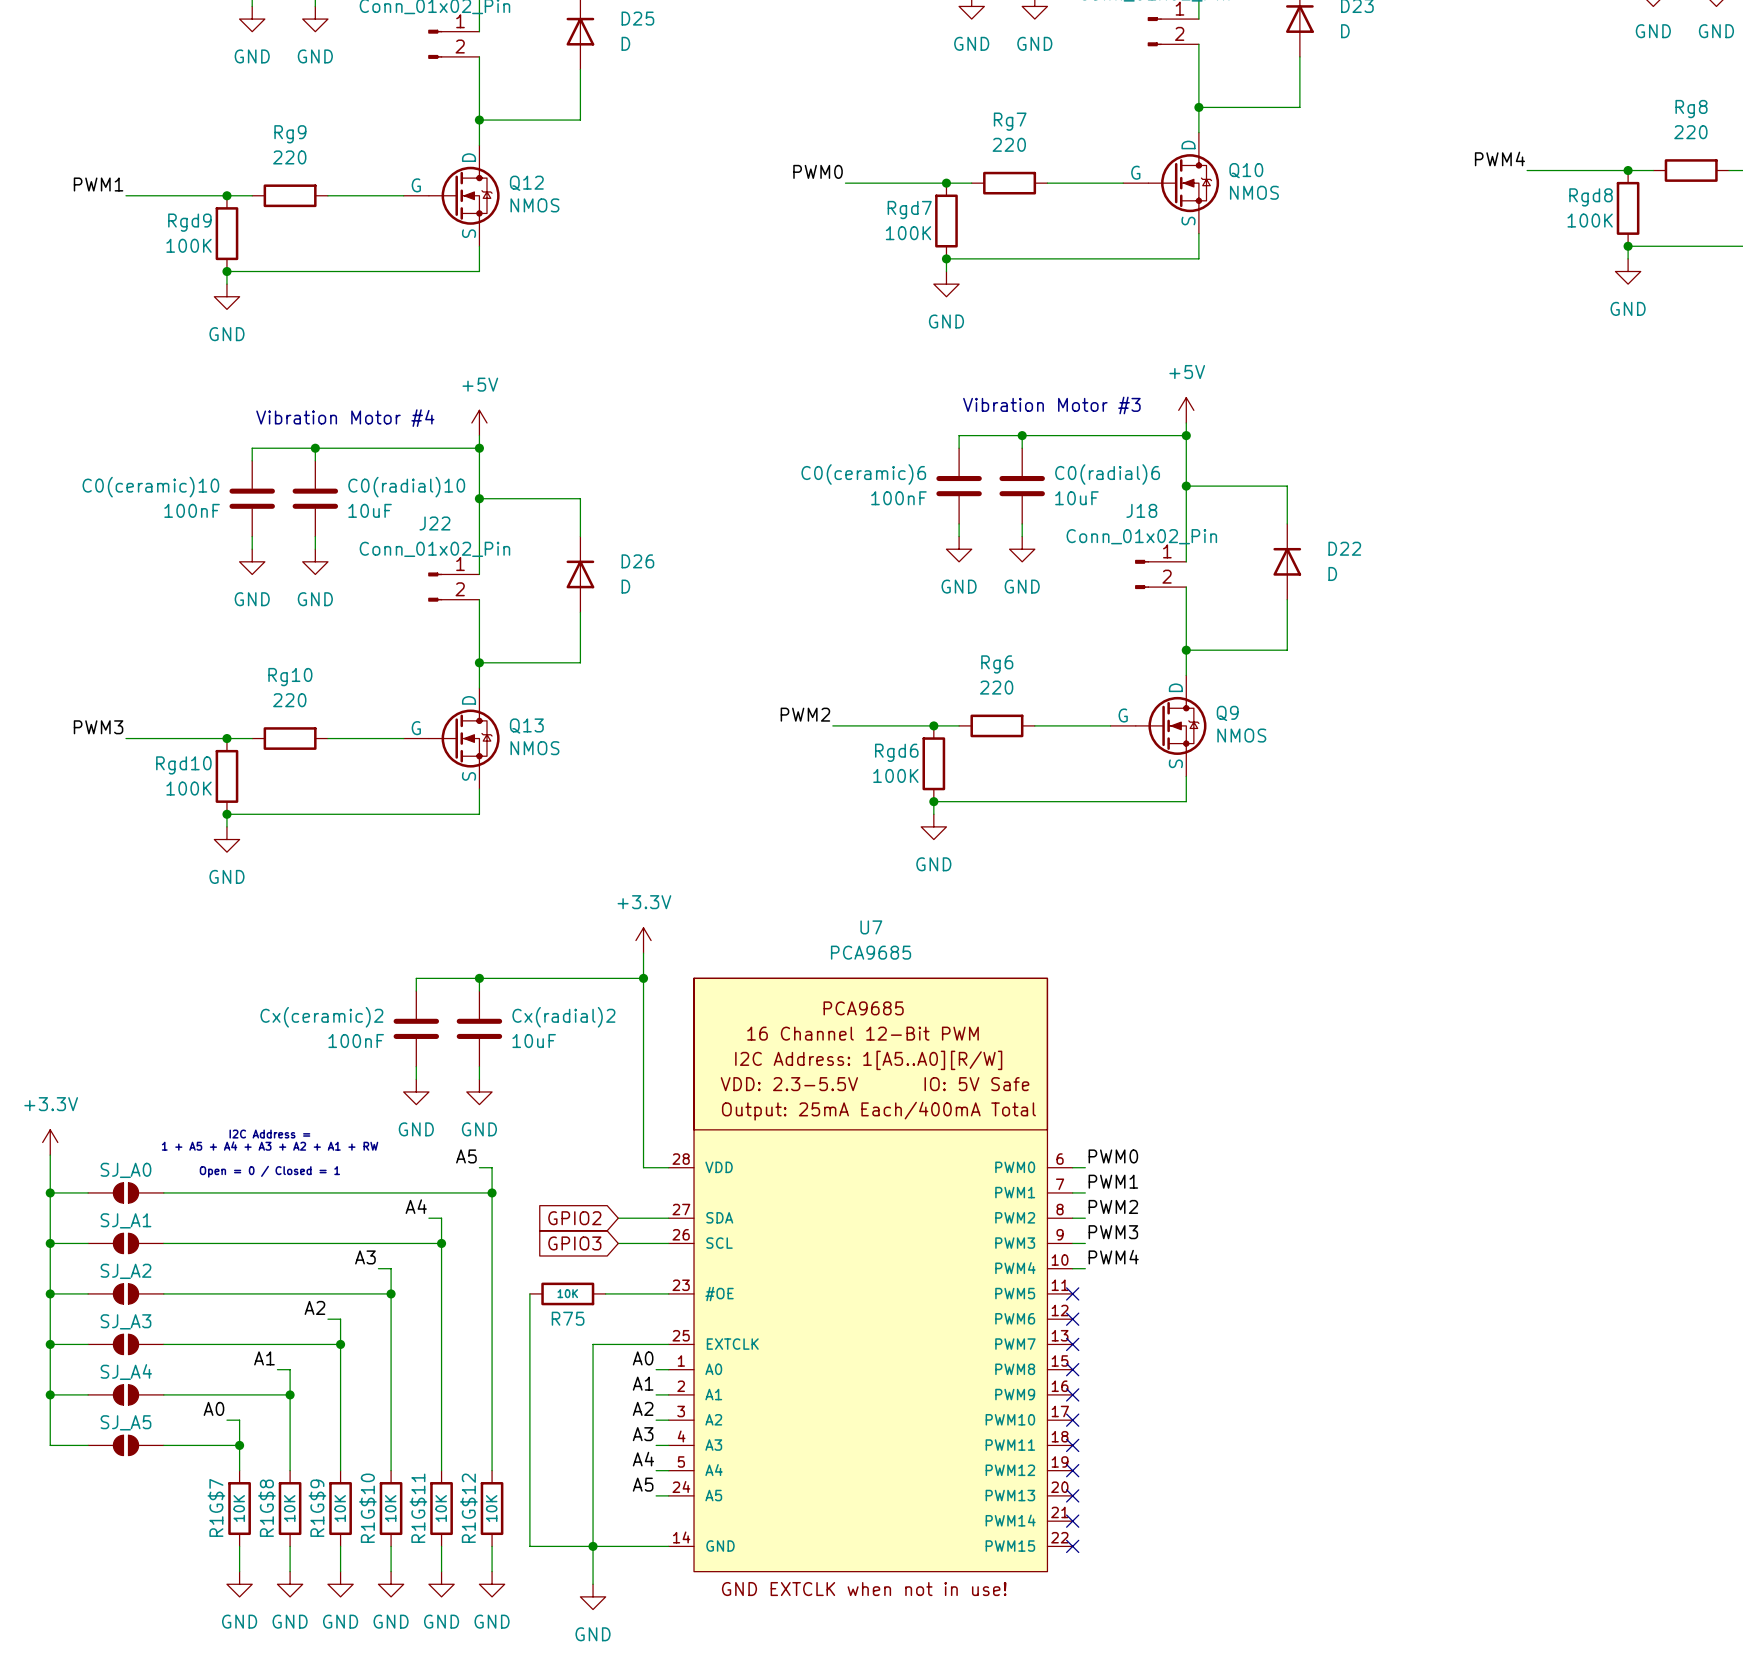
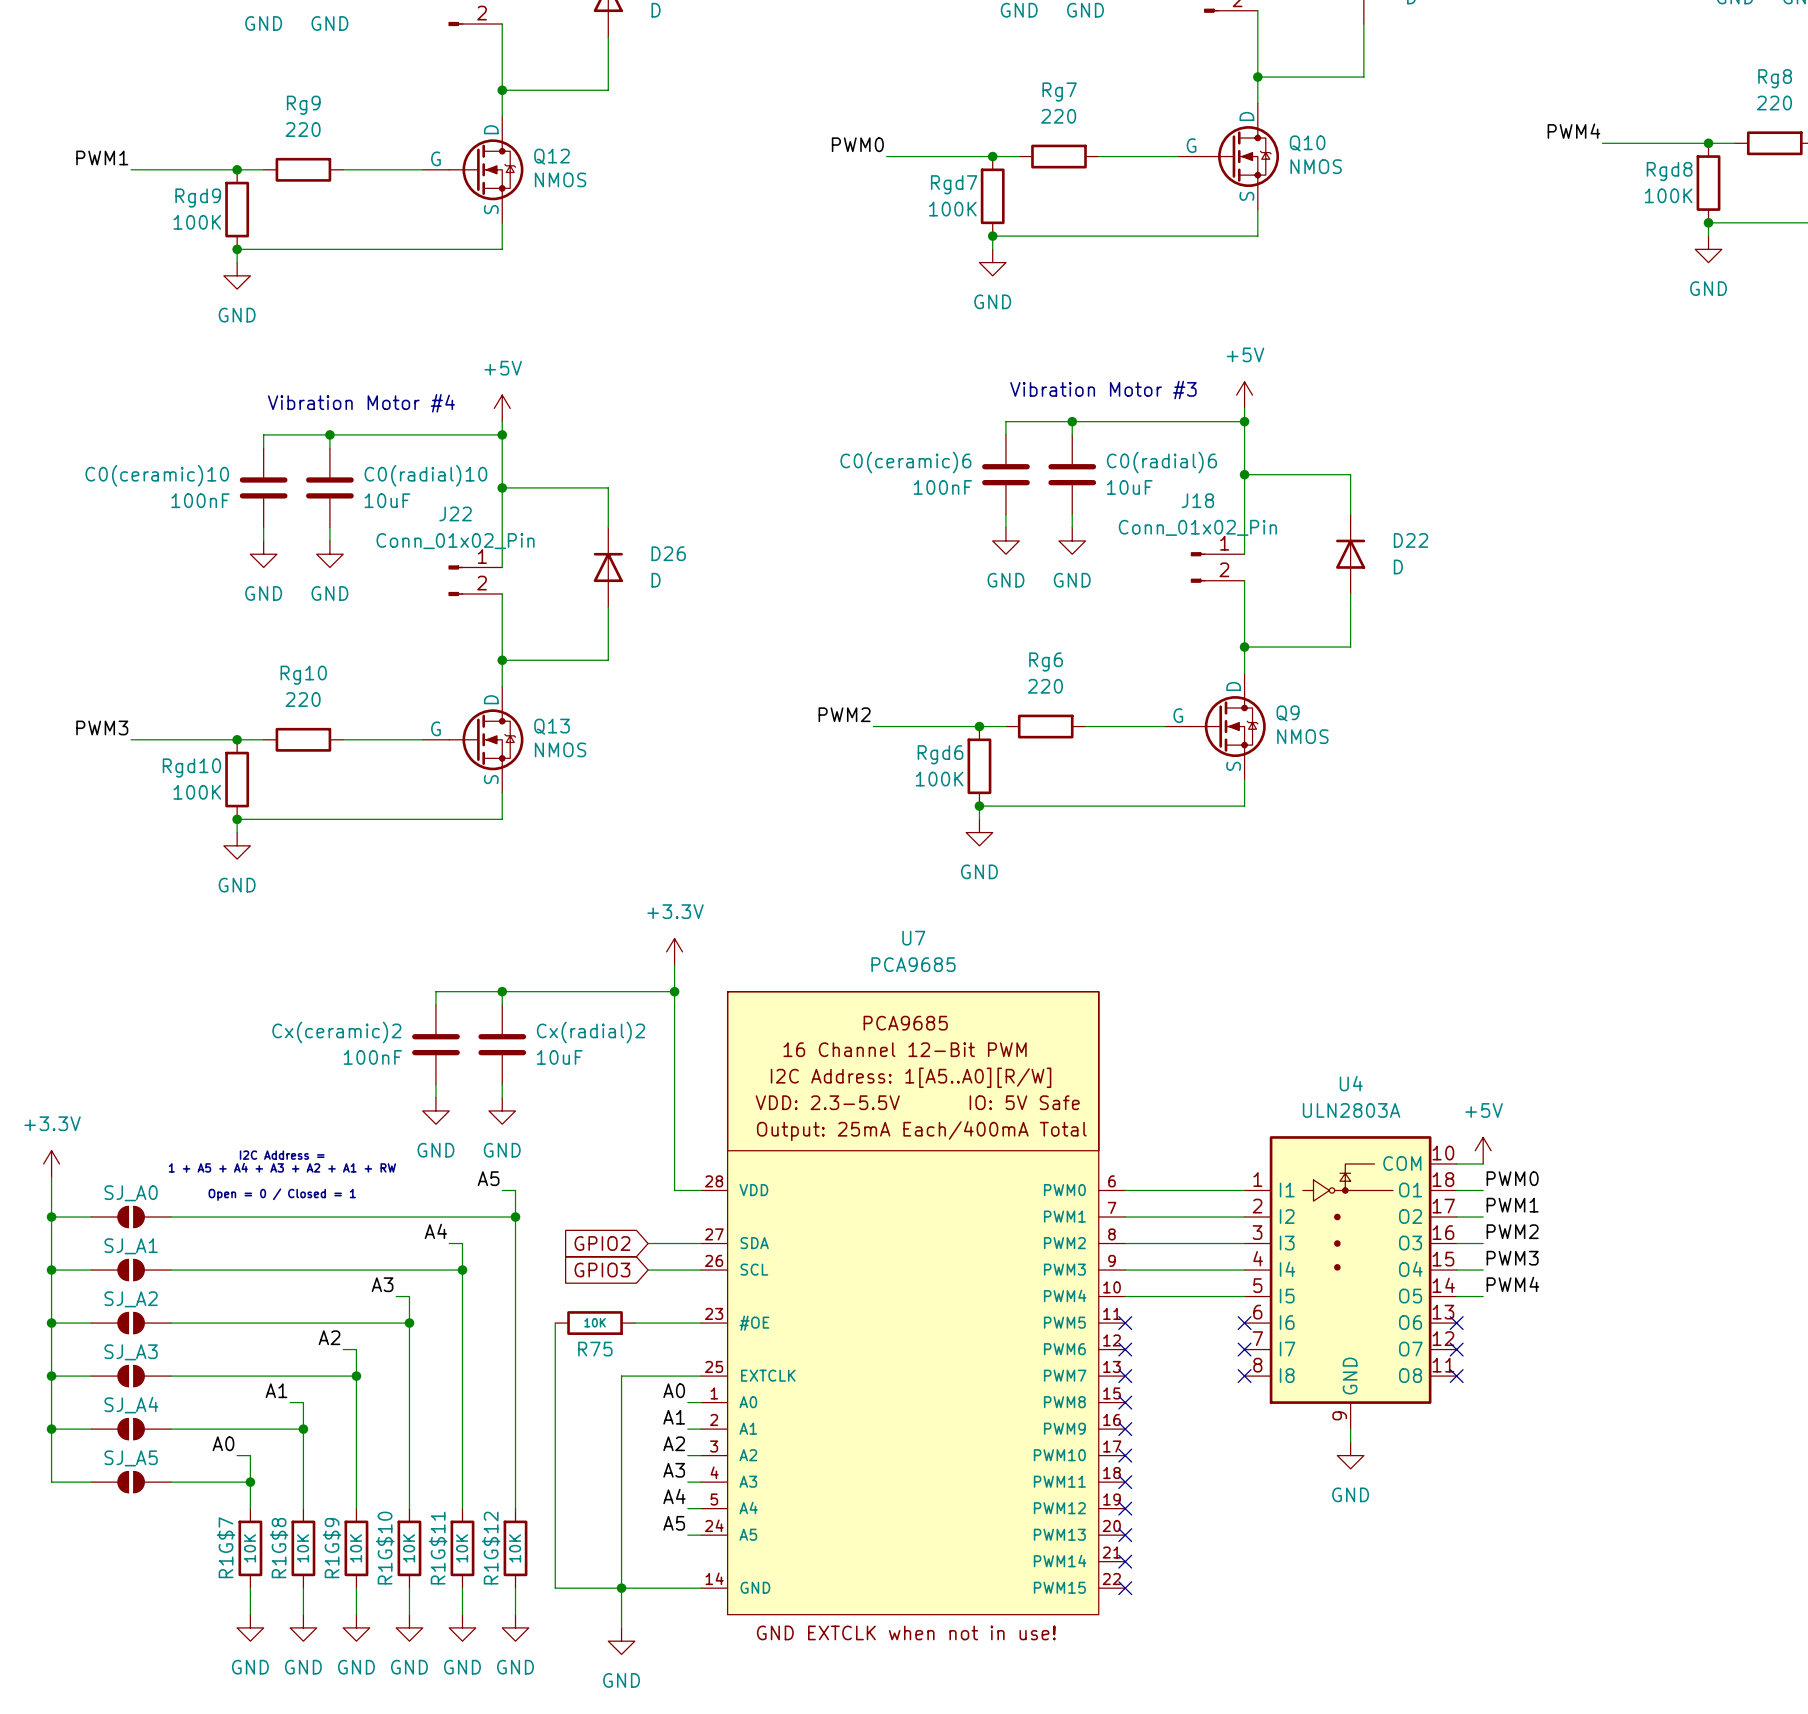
power symbol: none -> +5V (1483, 1150)
wire: none -> (1456, 1163) (1483, 1163)
label: PWM0 (1113, 1156) -> none
label: none -> PWM0 (1512, 1178)
wire: none -> (1138, 1190) (1244, 1190)
wire: none -> (1456, 1190) (1483, 1190)
label: PWM1 (1113, 1181) -> none
label: none -> PWM1 (1512, 1205)
wire: none -> (1138, 1217) (1244, 1217)
wire: none -> (1456, 1217) (1483, 1217)
label: PWM2 (1113, 1206) -> none
label: none -> PWM2 (1512, 1231)
wire: none -> (1138, 1243) (1244, 1243)
wire: none -> (1456, 1243) (1483, 1243)
label: PWM3 (1113, 1232) -> none
label: none -> PWM3 (1512, 1258)
wire: none -> (1138, 1270) (1244, 1270)
wire: none -> (1456, 1270) (1483, 1270)
U4: none -> ULN2803A (1350, 1282)
label: PWM4 (1113, 1257) -> none
label: none -> PWM4 (1512, 1284)
wire: none -> (1138, 1296) (1244, 1296)
wire: none -> (1456, 1296) (1483, 1296)
no-connect mark: none -> (1244, 1323)
no-connect mark: none -> (1456, 1323)
no-connect mark: none -> (1244, 1349)
no-connect mark: none -> (1456, 1349)
no-connect mark: none -> (1244, 1376)
no-connect mark: none -> (1456, 1376)
wire: none -> (1350, 1429) (1350, 1442)
power symbol: none -> GND (1350, 1455)

